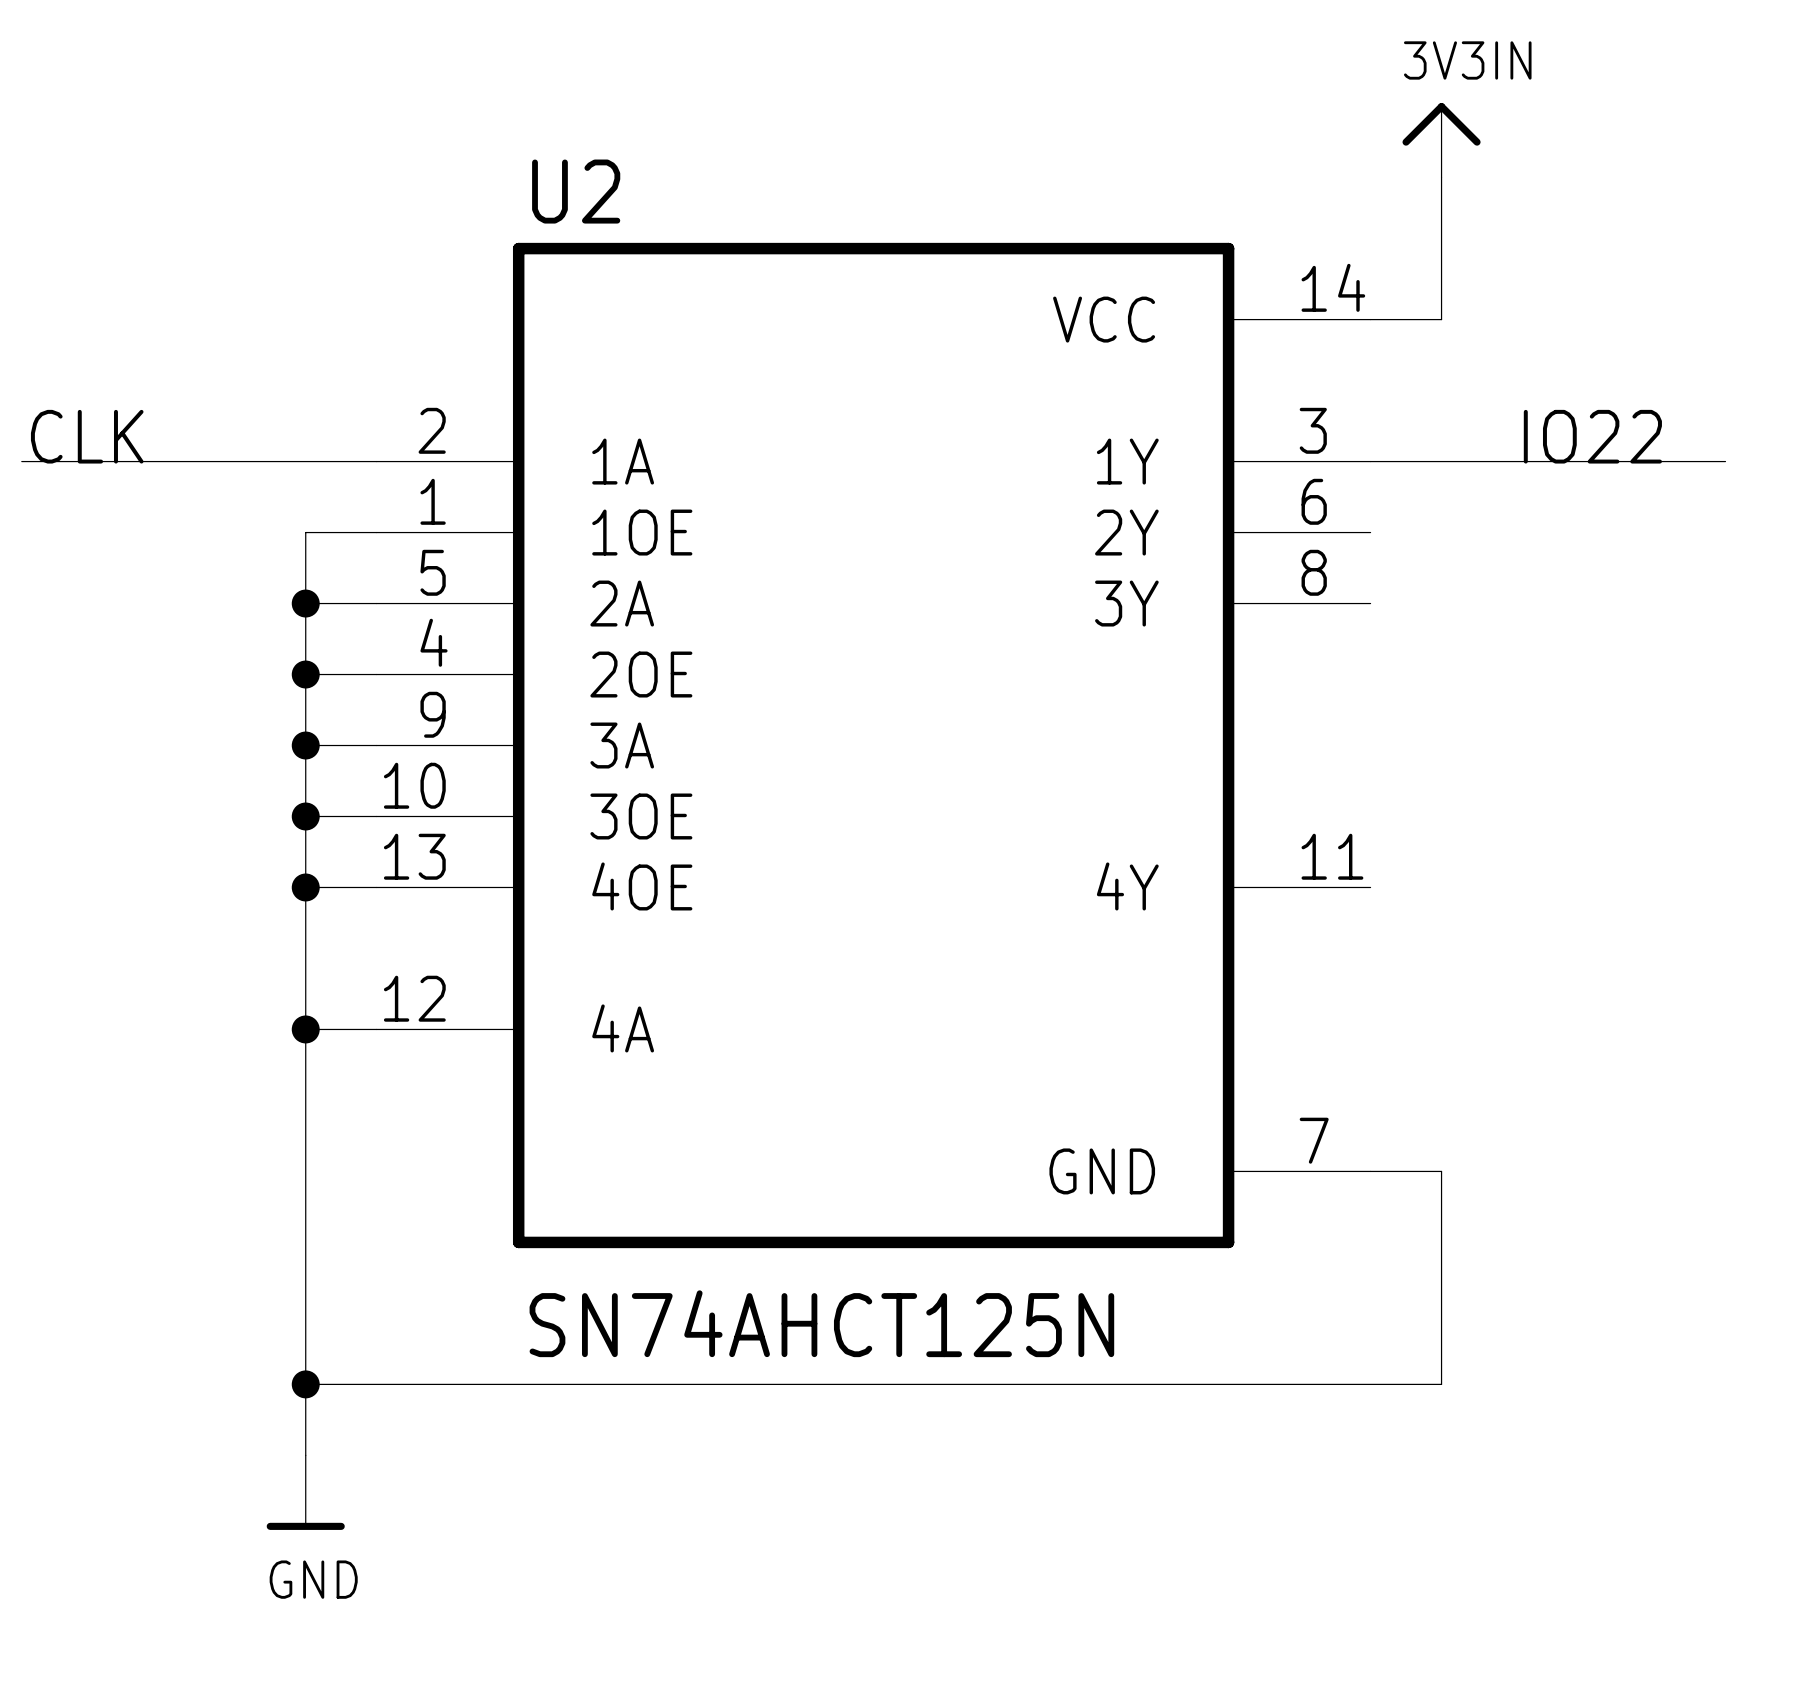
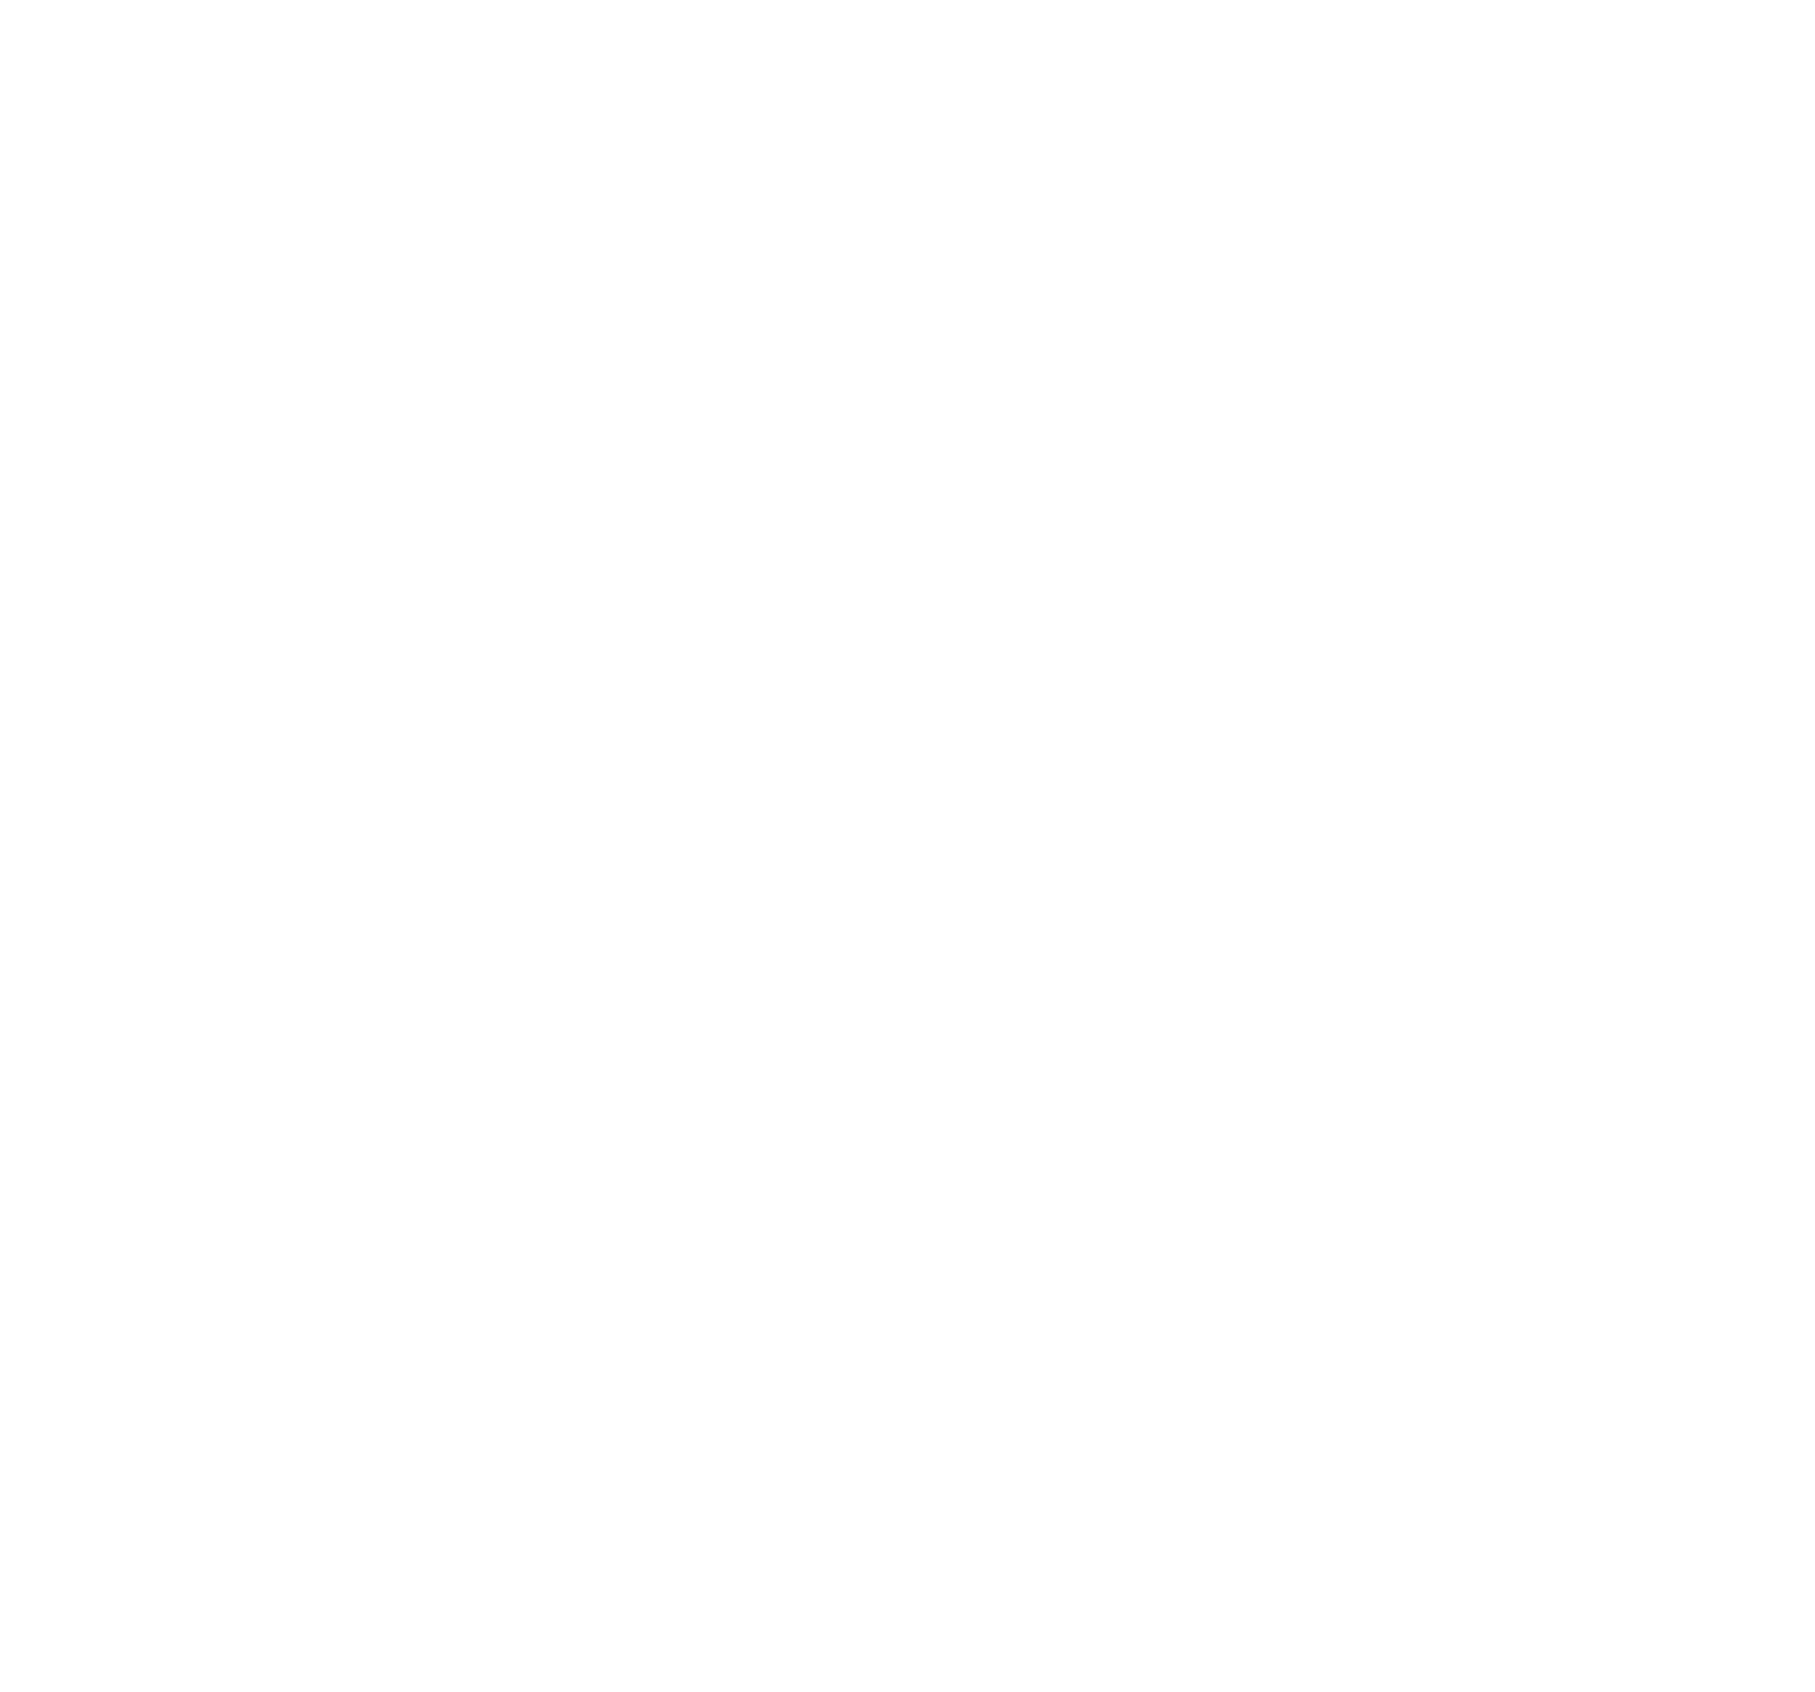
power symbol: 3V3IN (1441, 140) -> none
wire: (1441, 177) (1441, 319) (1370, 319) -> none
label: CLK (87, 436) -> none
label: IO22 (1592, 436) -> none
wire: (21, 461) (376, 461) -> none
wire: (1370, 461) (1725, 461) -> none
wire: (376, 532) (305, 532) (305, 1455) -> none
wire: (305, 603) (376, 603) -> none
junction: (305, 603) -> none
wire: (305, 674) (376, 674) -> none
junction: (305, 674) -> none
wire: (305, 745) (376, 745) -> none
junction: (305, 745) -> none
U2: SN74AHCT125N (873, 745) -> none
wire: (305, 816) (376, 816) -> none
junction: (305, 816) -> none
wire: (305, 887) (376, 887) -> none
junction: (305, 887) -> none
wire: (305, 1029) (376, 1029) -> none
junction: (305, 1029) -> none
wire: (1370, 1171) (1441, 1171) (1441, 1384) (305, 1384) -> none
junction: (305, 1384) -> none
power symbol: GND (305, 1492) -> none

